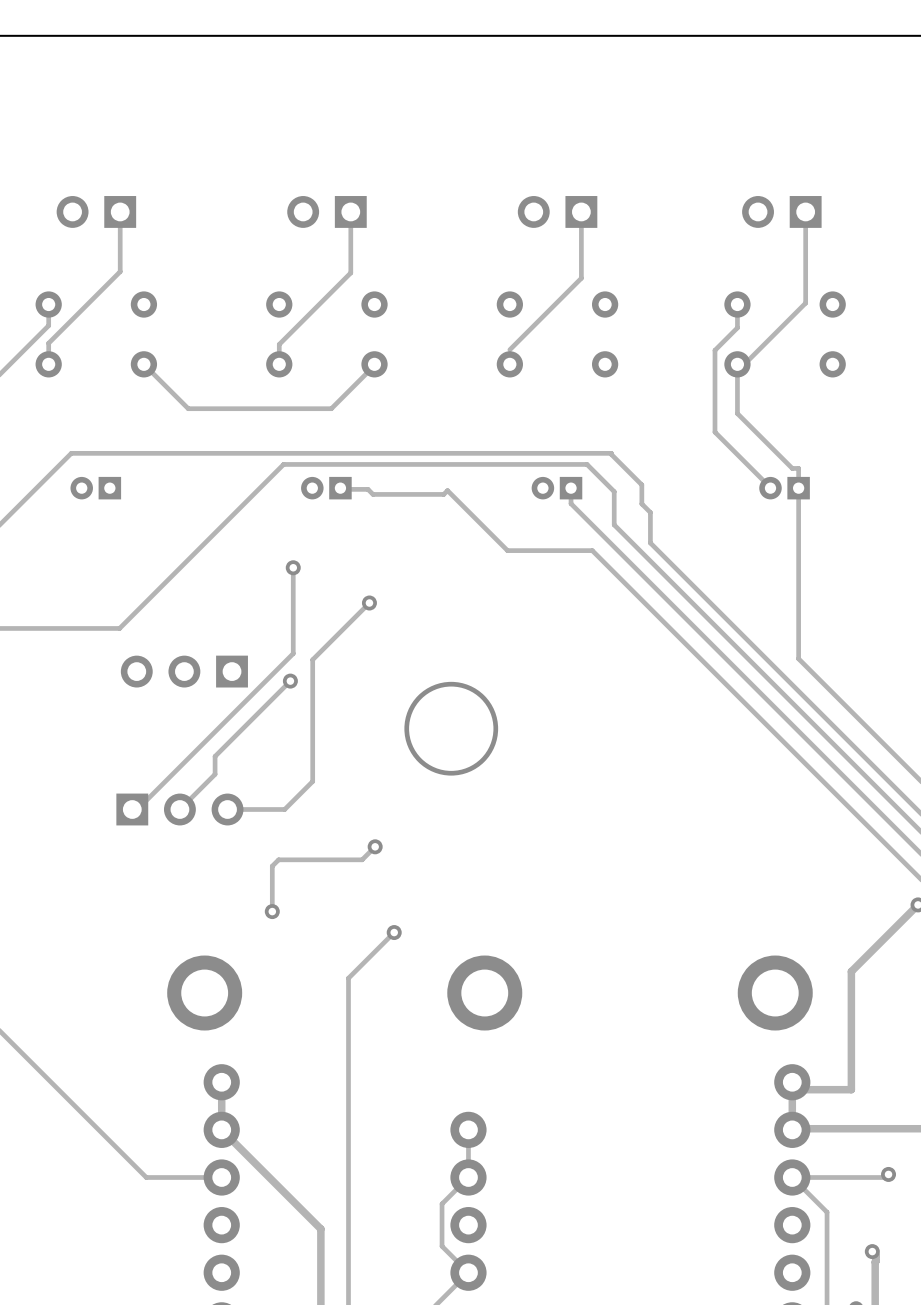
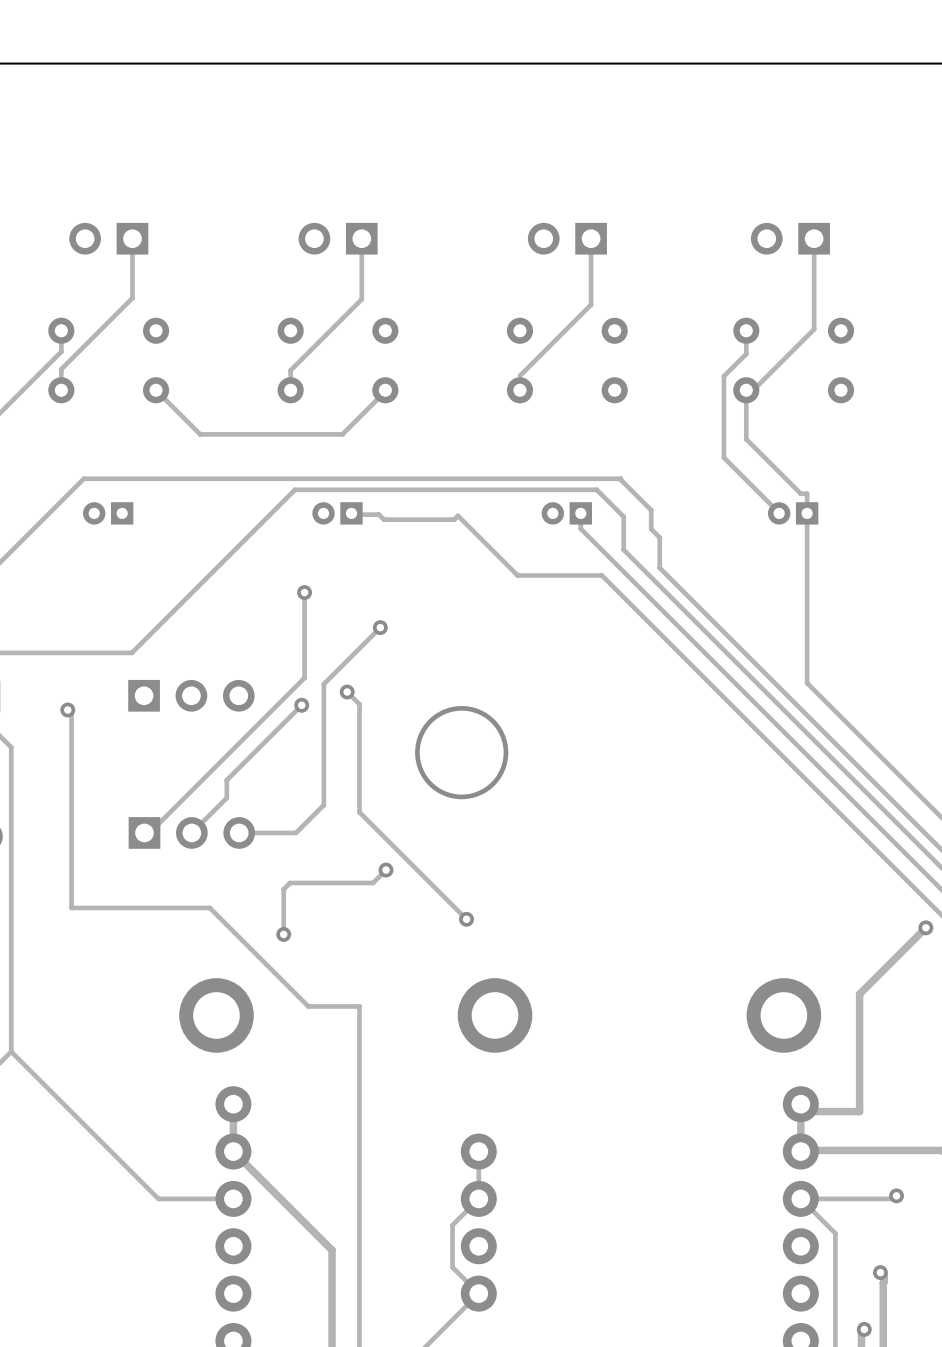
track: none -> (347, 692) (359, 704) (359, 812) (466, 919)
via: none -> (347, 692)
part rotation: 0° (184, 671) -> 180° (191, 695)
via: none -> (67, 710)
track: (394, 932) (348, 978) (348, 983) -> (67, 710) (71, 713) (71, 907) (209, 907) (308, 1006) (359, 1006)
via position: (394, 932) -> (466, 919)

